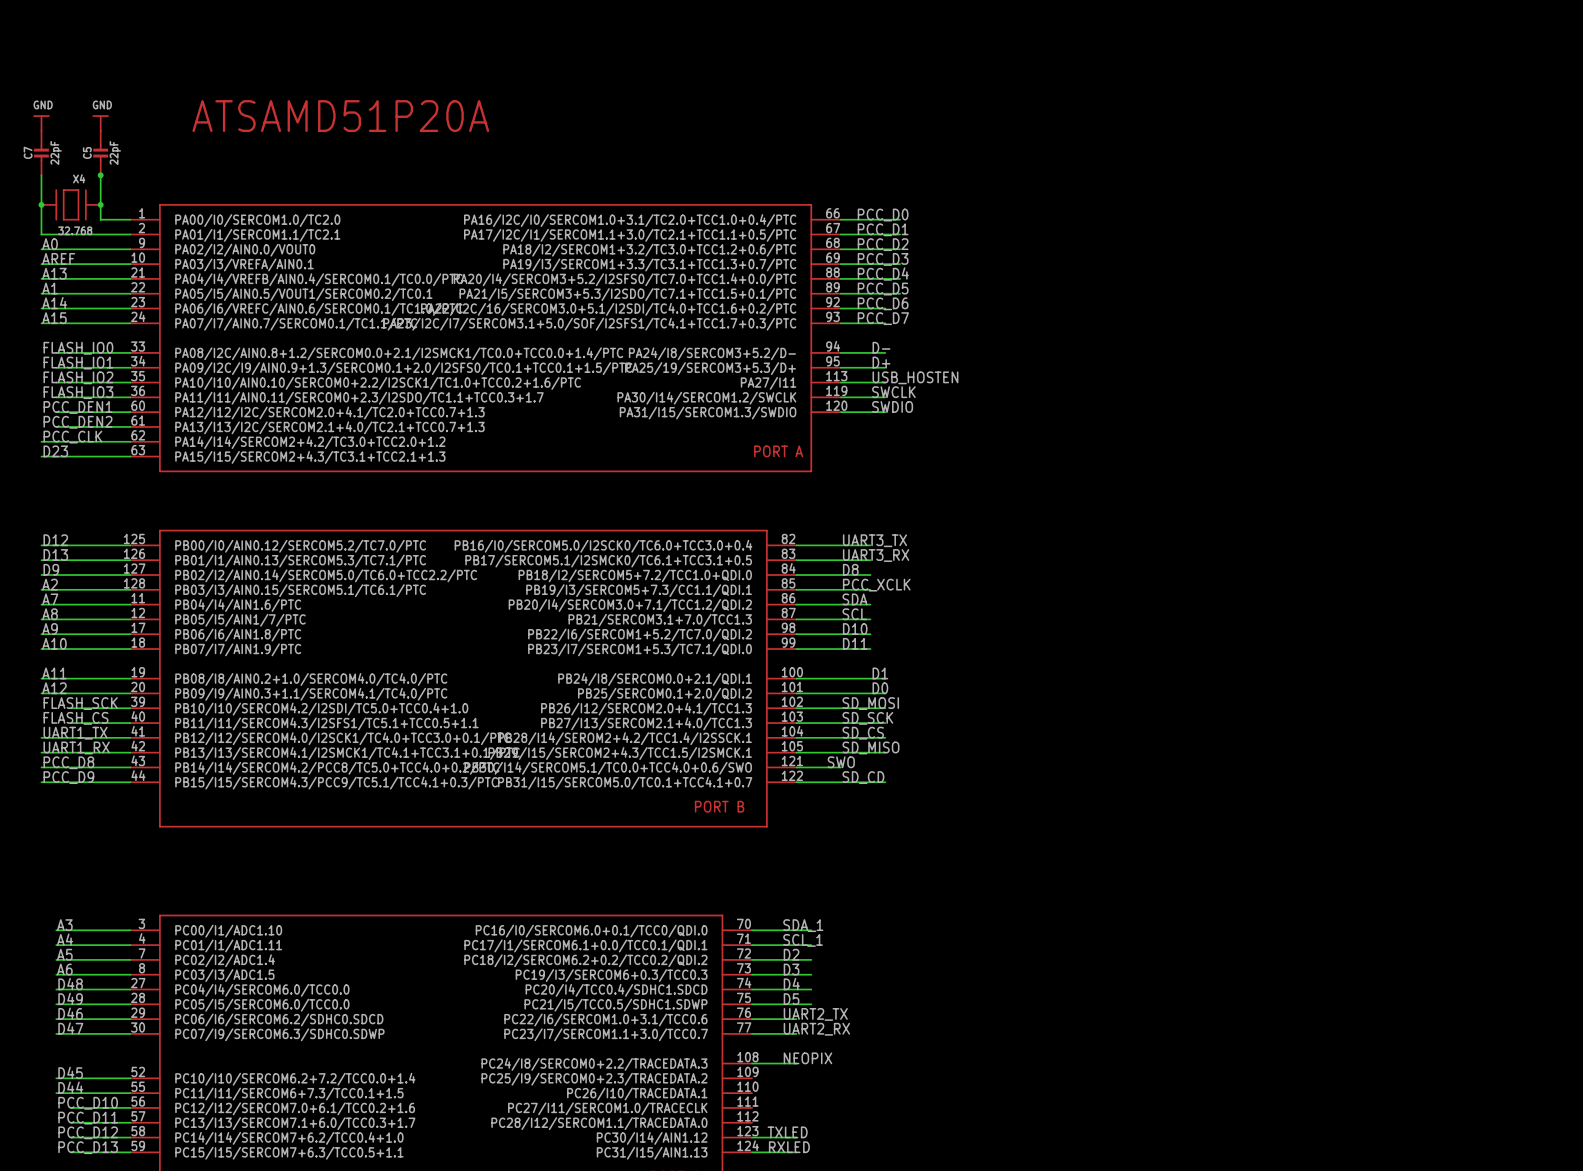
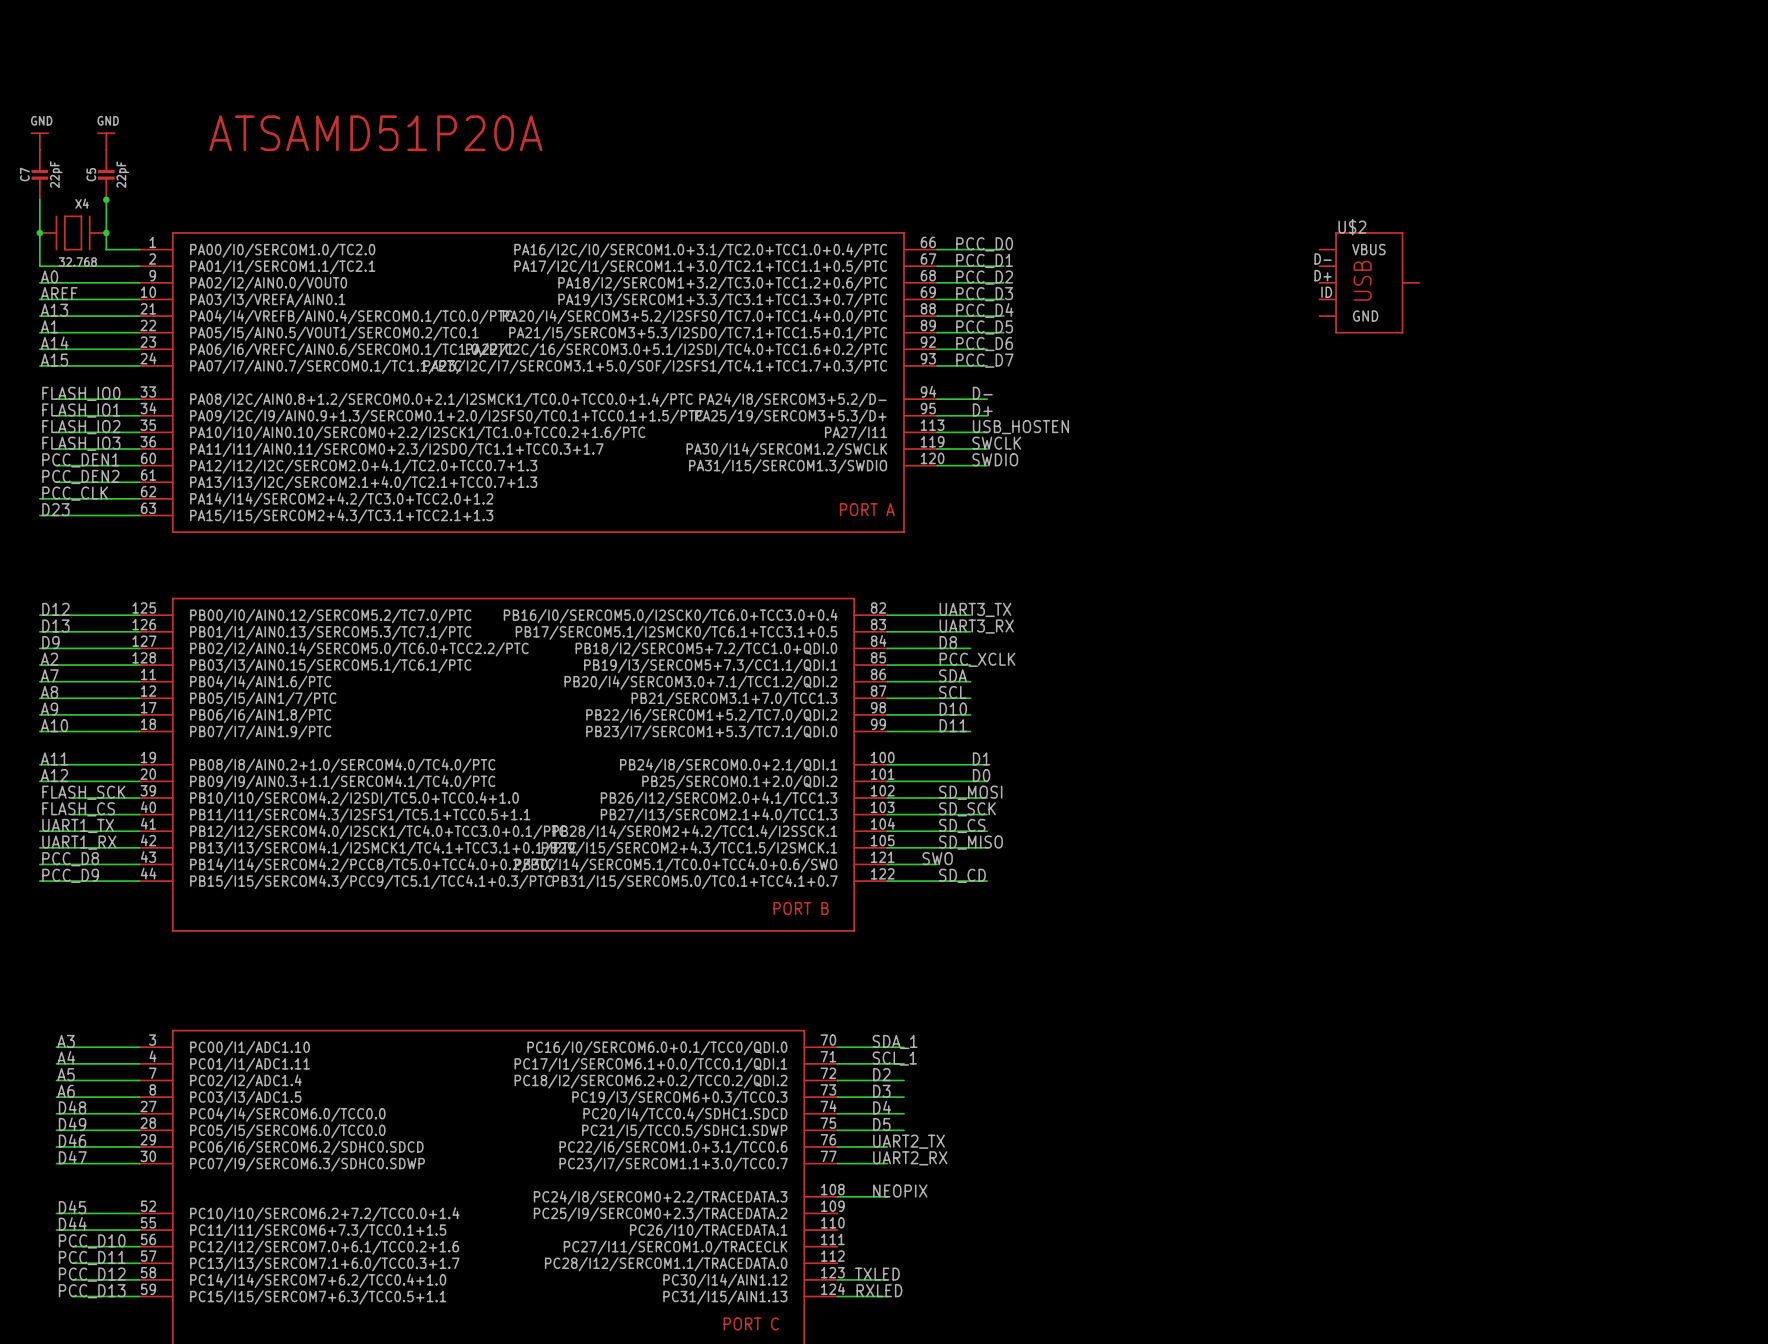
U$2: none -> (1369, 282)

